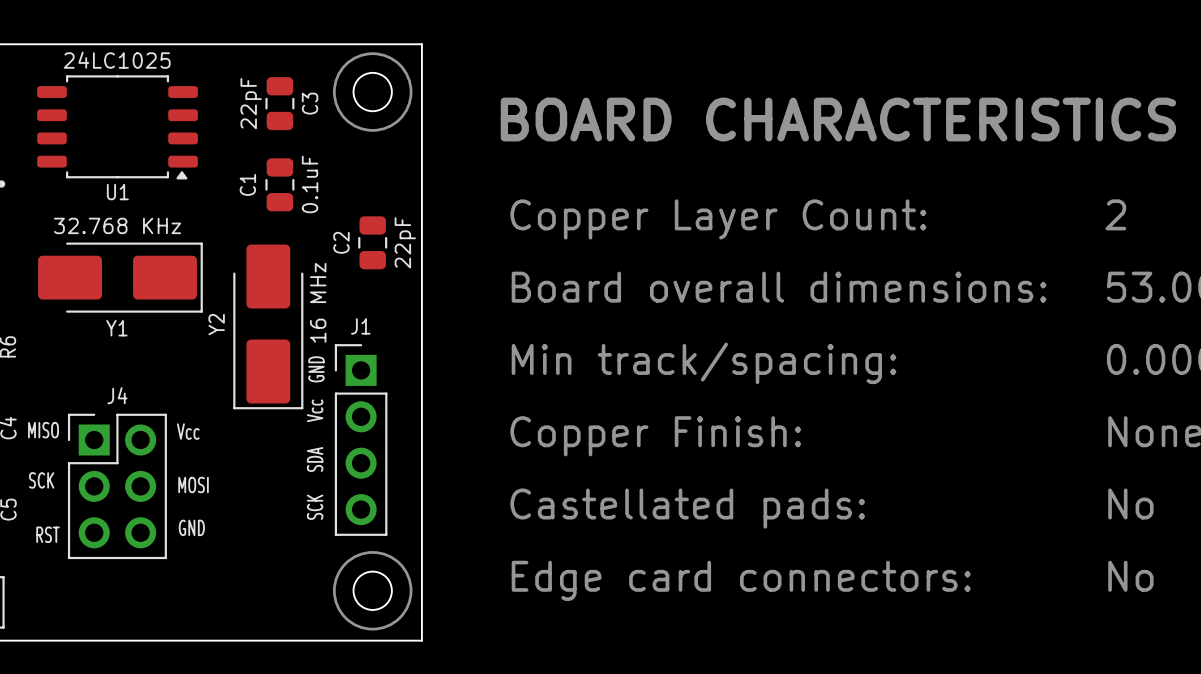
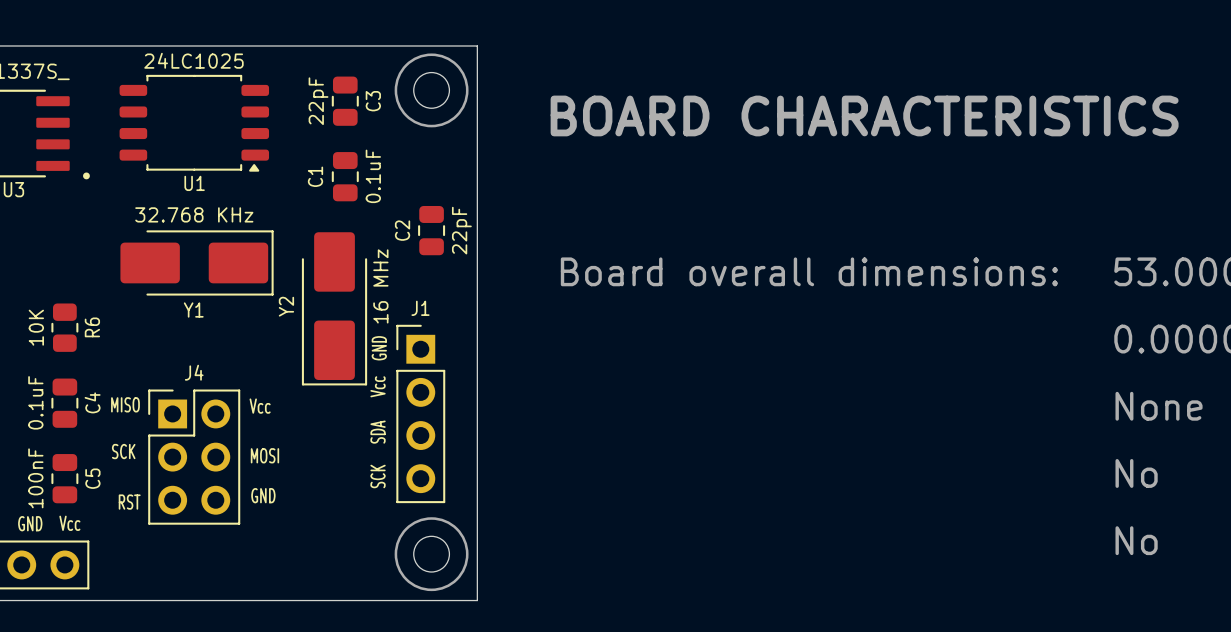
text: 2 (1115, 214) -> none
text: Copper Layer Count: (718, 219) -> none
text: Min track/spacing: (704, 363) -> none
text: Copper Finish: (655, 436) -> none
text: Castellated pads: (687, 508) -> none
text: Edge card connectors: (741, 580) -> none

